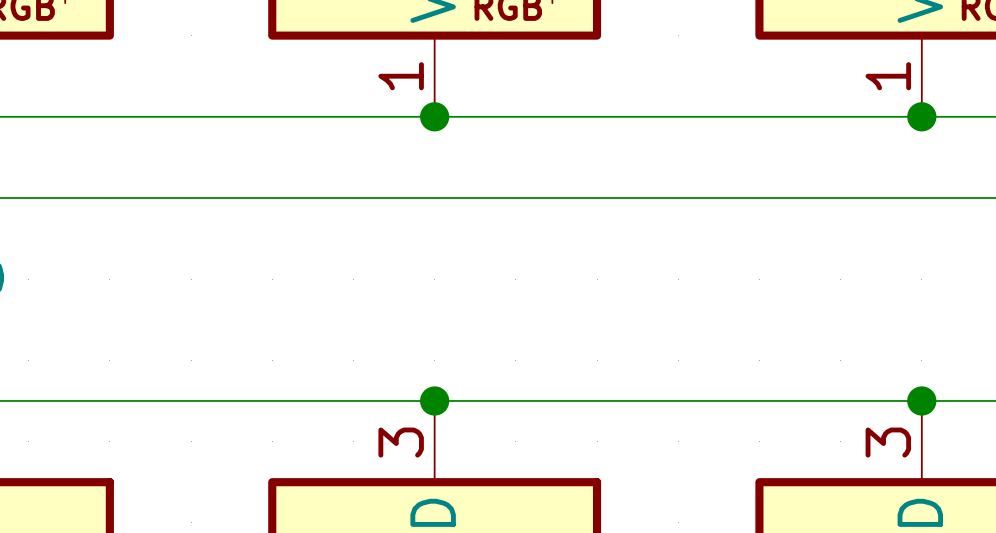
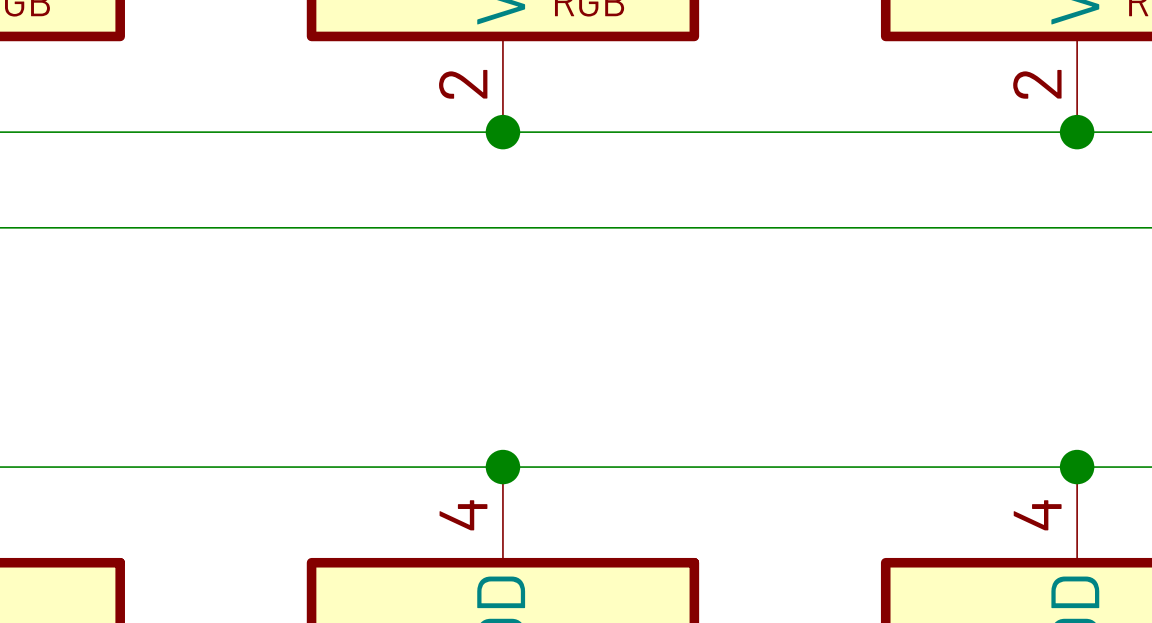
part pin number: 1 (401, 76) -> 2 (463, 84)
part pin number: 1 (888, 76) -> 2 (1037, 84)
part pin number: 3 (401, 442) -> 4 (463, 515)
part pin number: 3 (888, 442) -> 4 (1037, 515)

